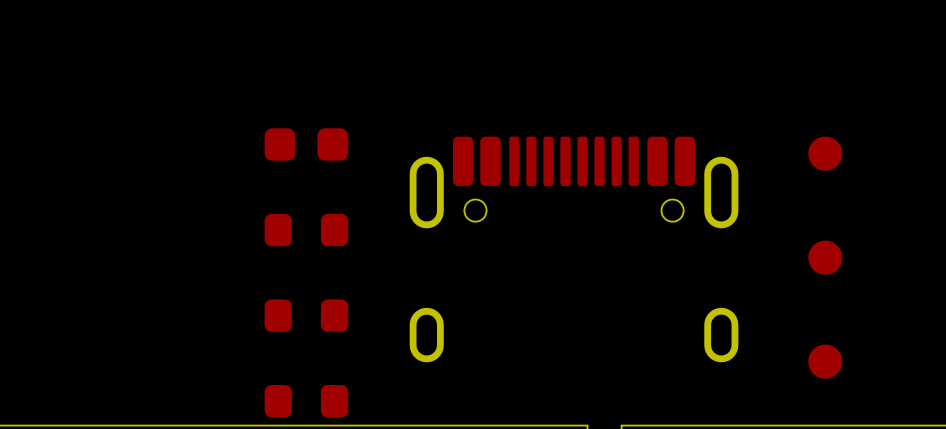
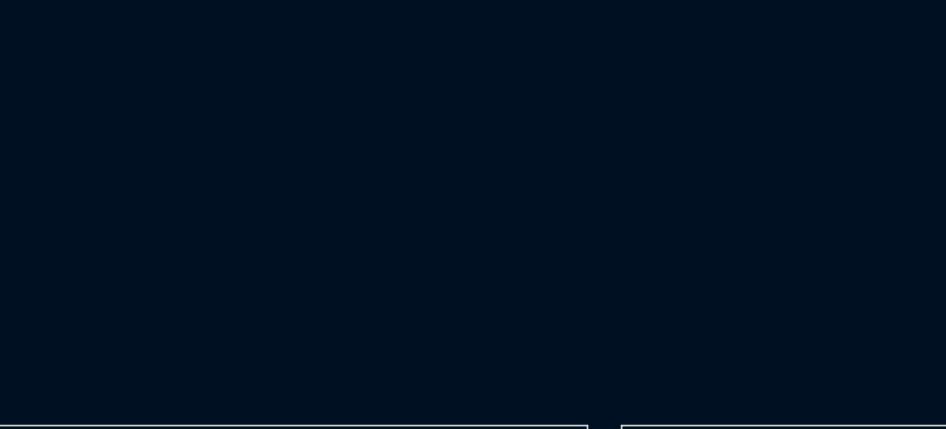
part: (306, 144) -> none
part: (825, 153) -> none
part: (306, 230) -> none
part: (574, 249) -> none
part: (825, 257) -> none
part: (306, 315) -> none
part: (825, 361) -> none
part: (306, 401) -> none

